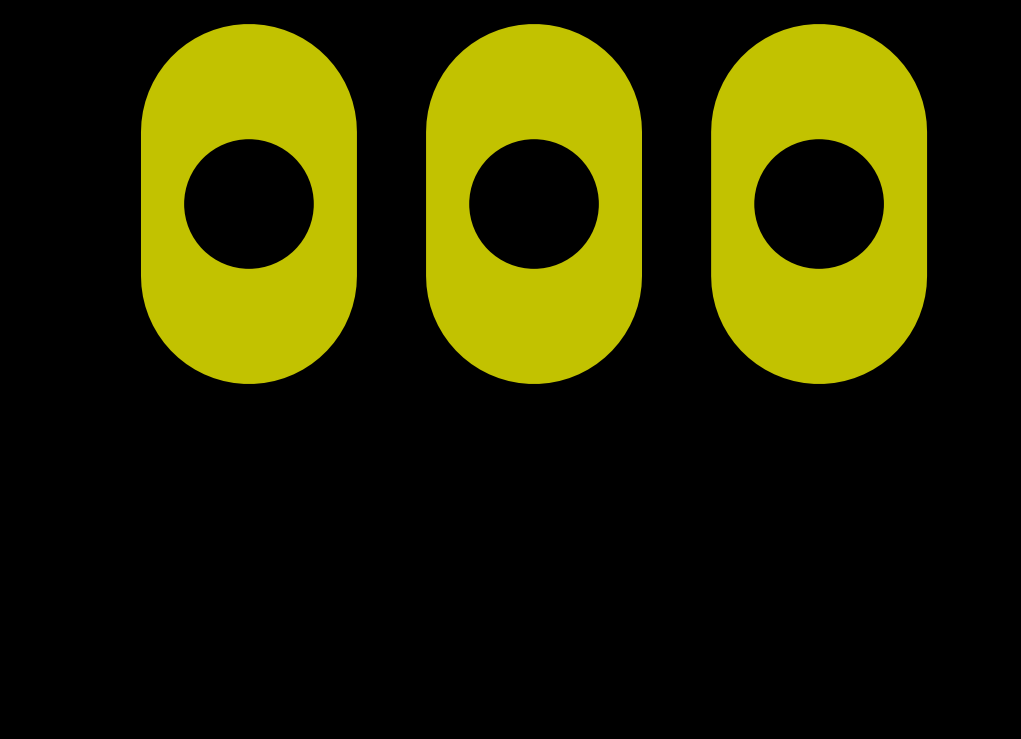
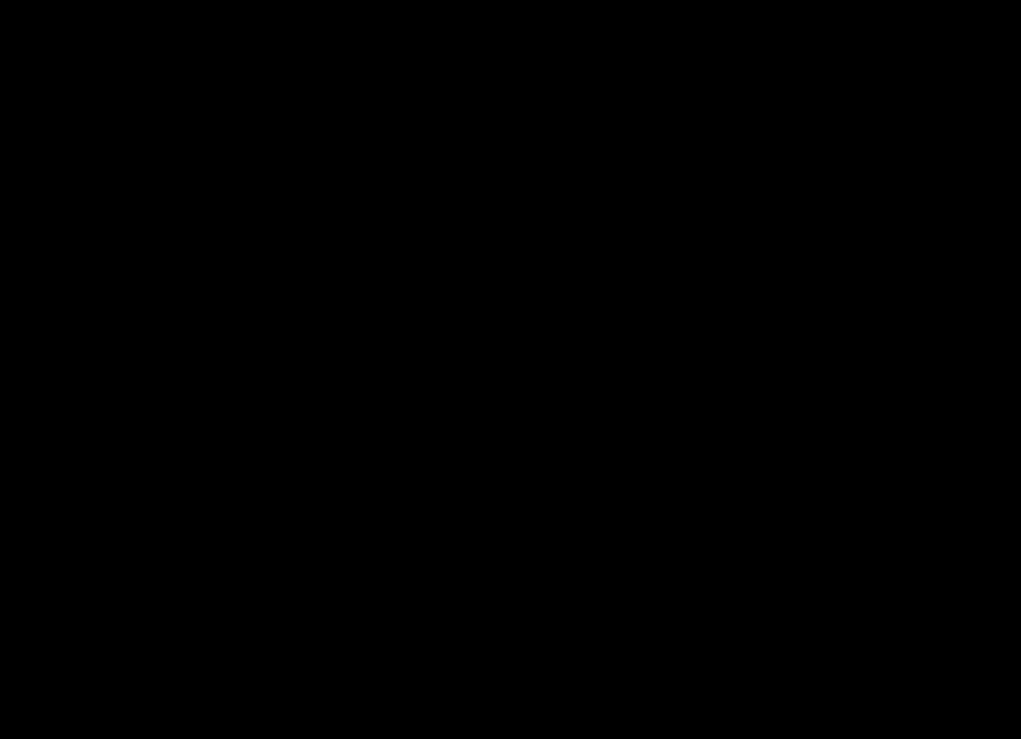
part: (534, 204) -> none

